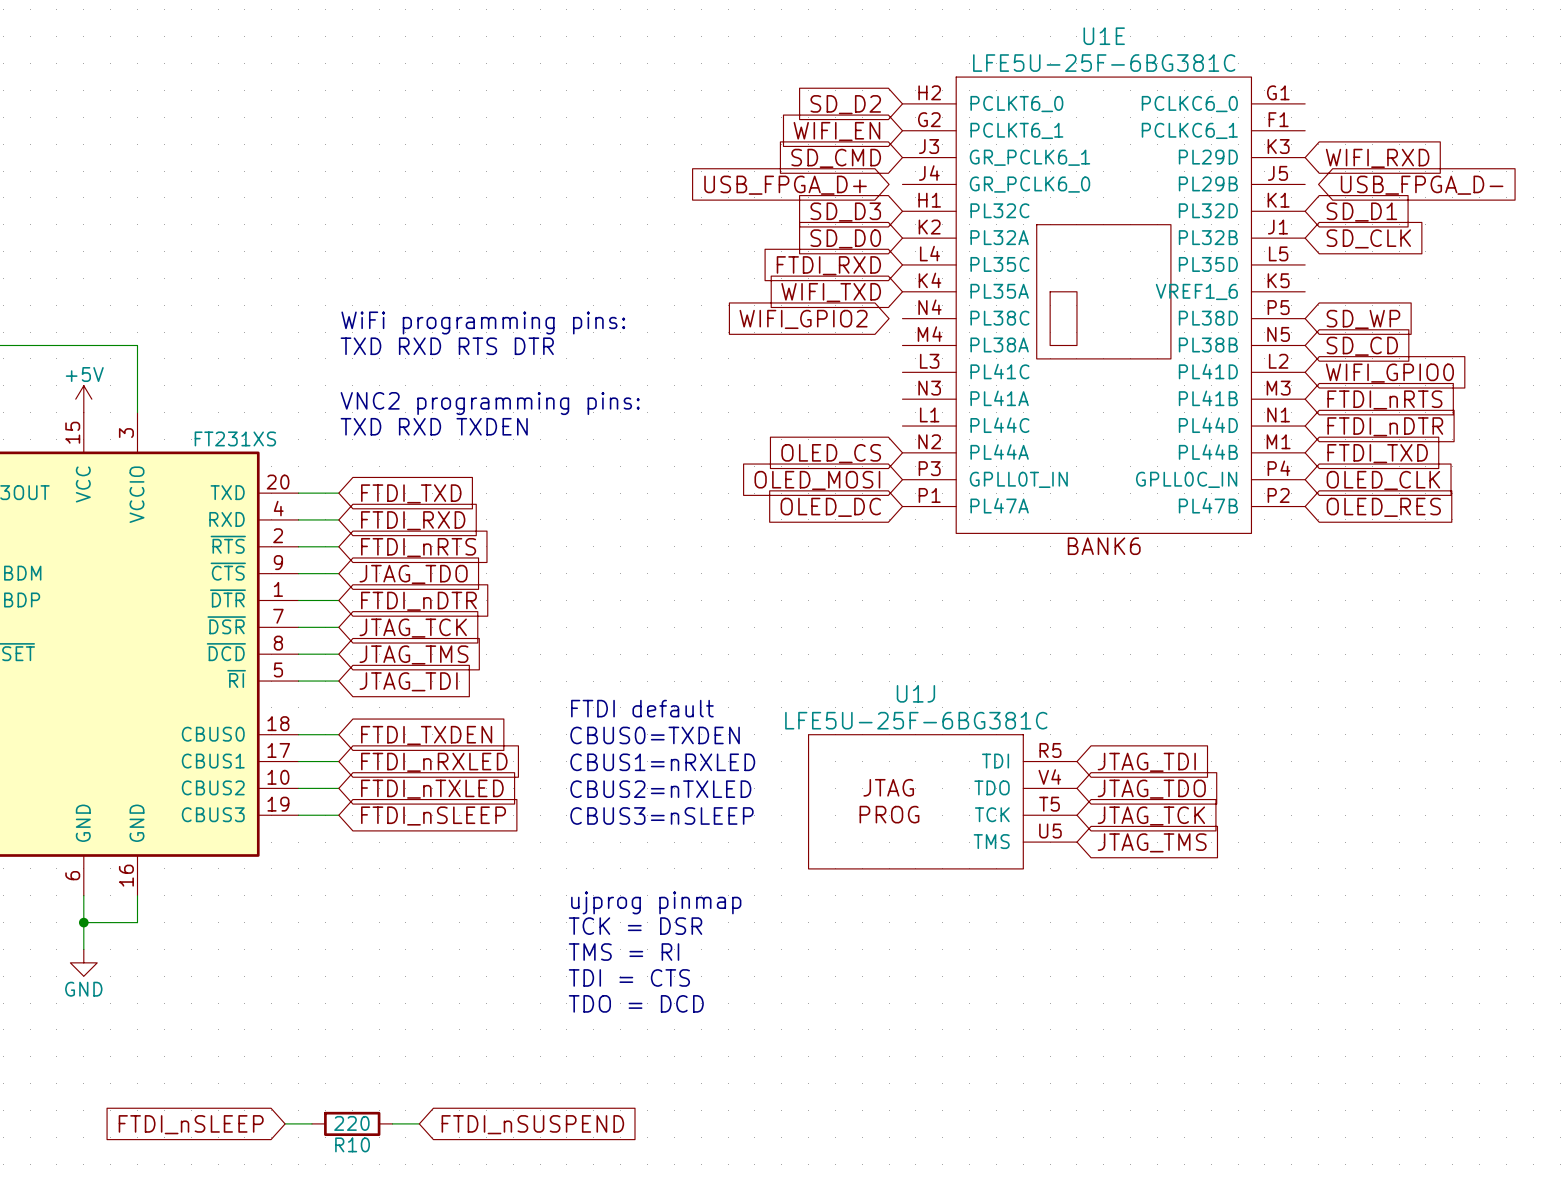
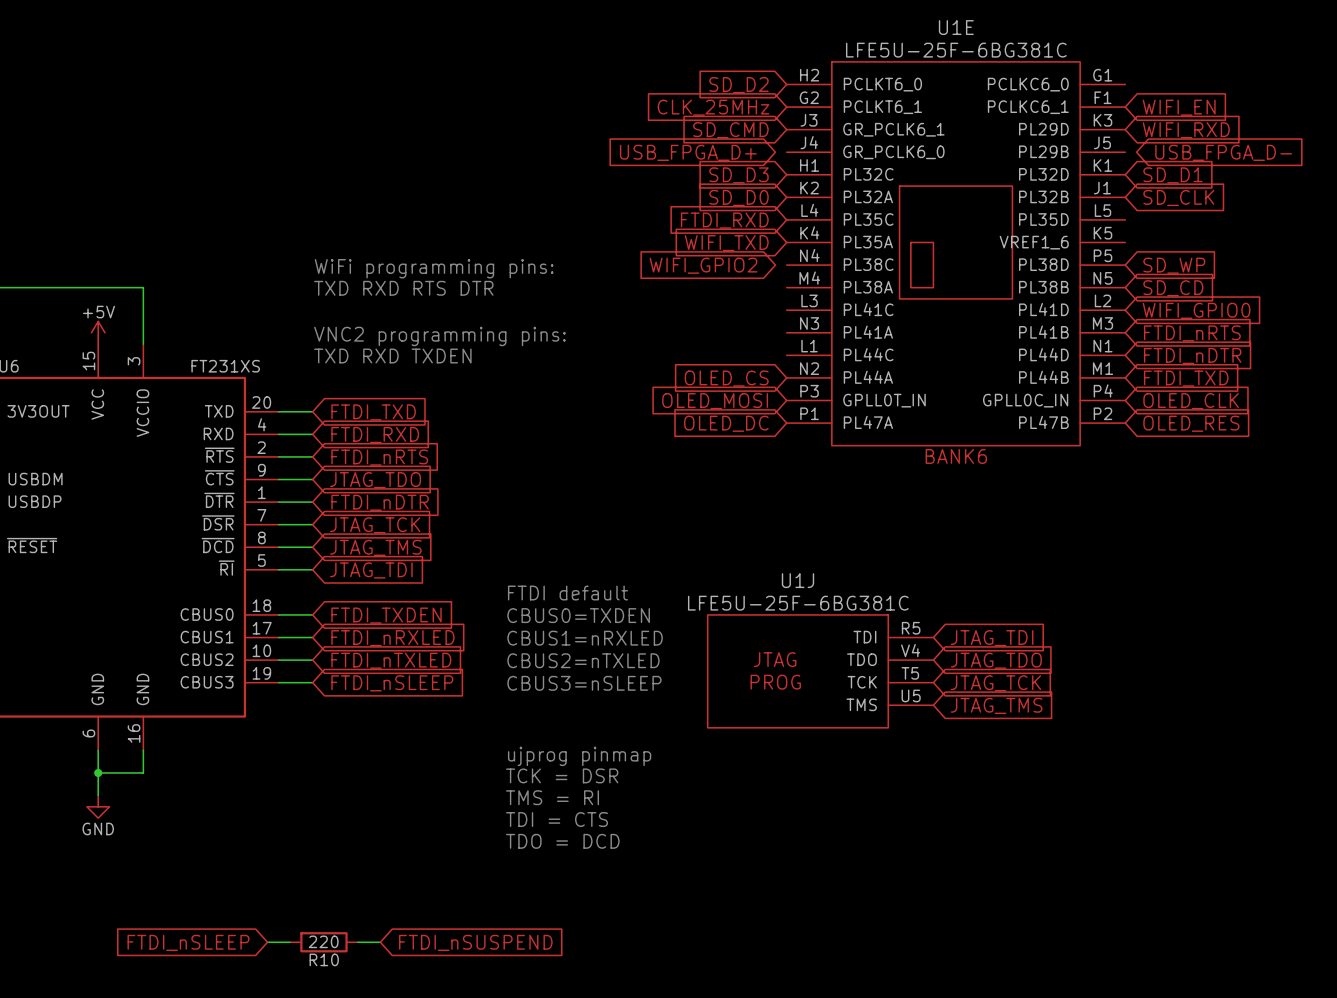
global label: WIFI_EN (836, 131) -> CLK_25MHz (713, 107)
global label: none -> WIFI_EN (1179, 107)

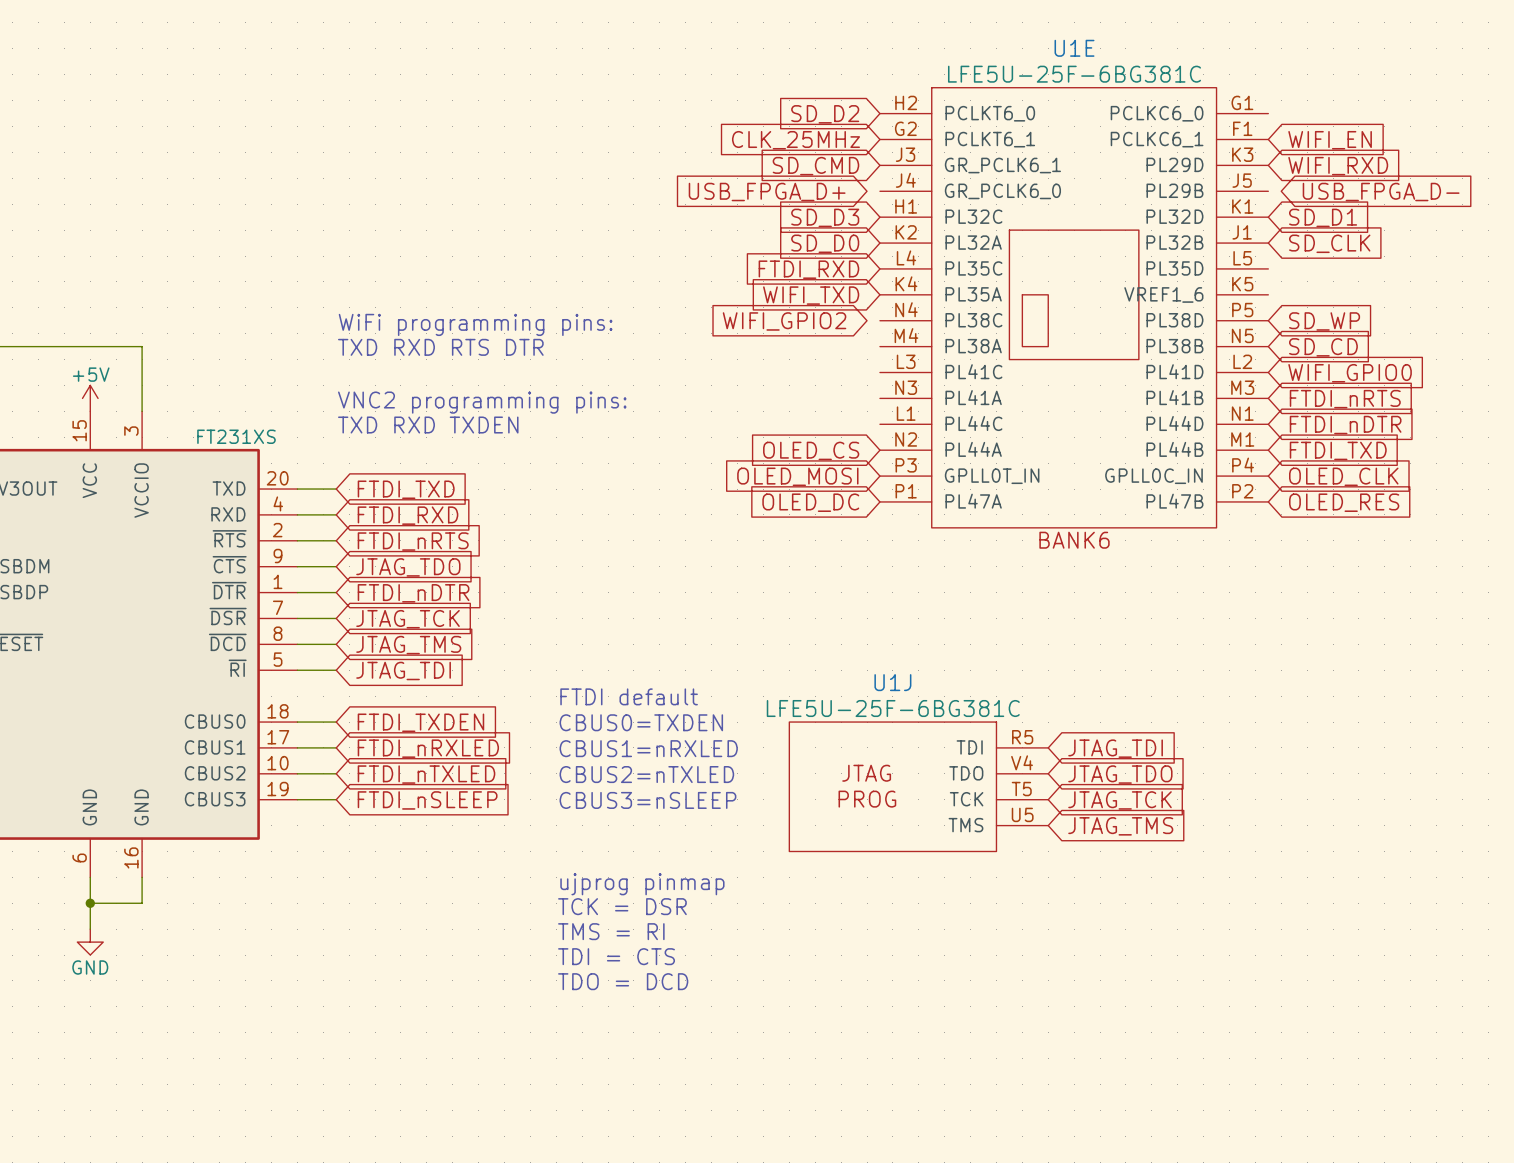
global label: FTDI_nSLEEP (188, 942) -> none
wire: (267, 942) (290, 942) -> none
R10: 220 (323, 942) -> none
wire: (357, 942) (380, 942) -> none
global label: FTDI_nSUSPEND (475, 942) -> none

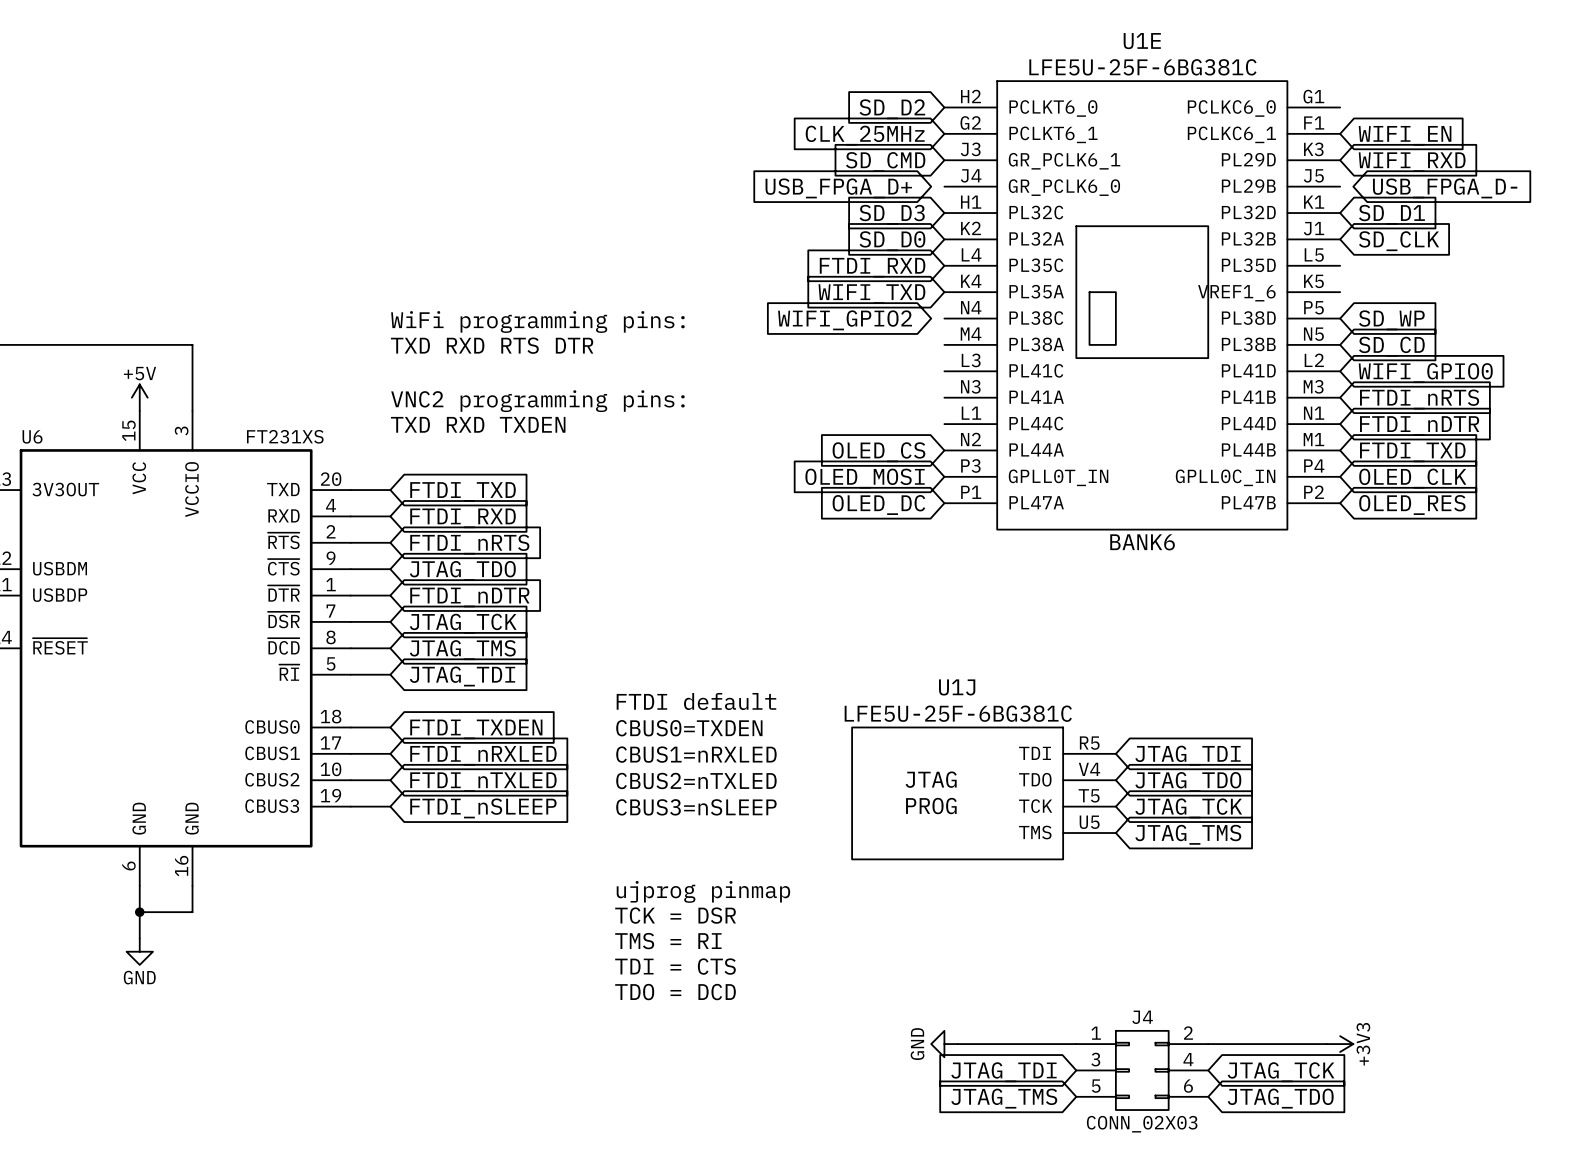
power symbol: none -> GND (944, 1044)
wire: none -> (957, 1044) (1076, 1044)
wire: none -> (1208, 1044) (1326, 1044)
power symbol: none -> +3V3 (1340, 1044)
J4: none -> CONN_02X03 (1142, 1070)
global label: none -> JTAG_TDI (1003, 1072)
global label: none -> JTAG_TCK (1281, 1072)
global label: none -> JTAG_TMS (1004, 1098)
global label: none -> JTAG_TDO (1280, 1098)

